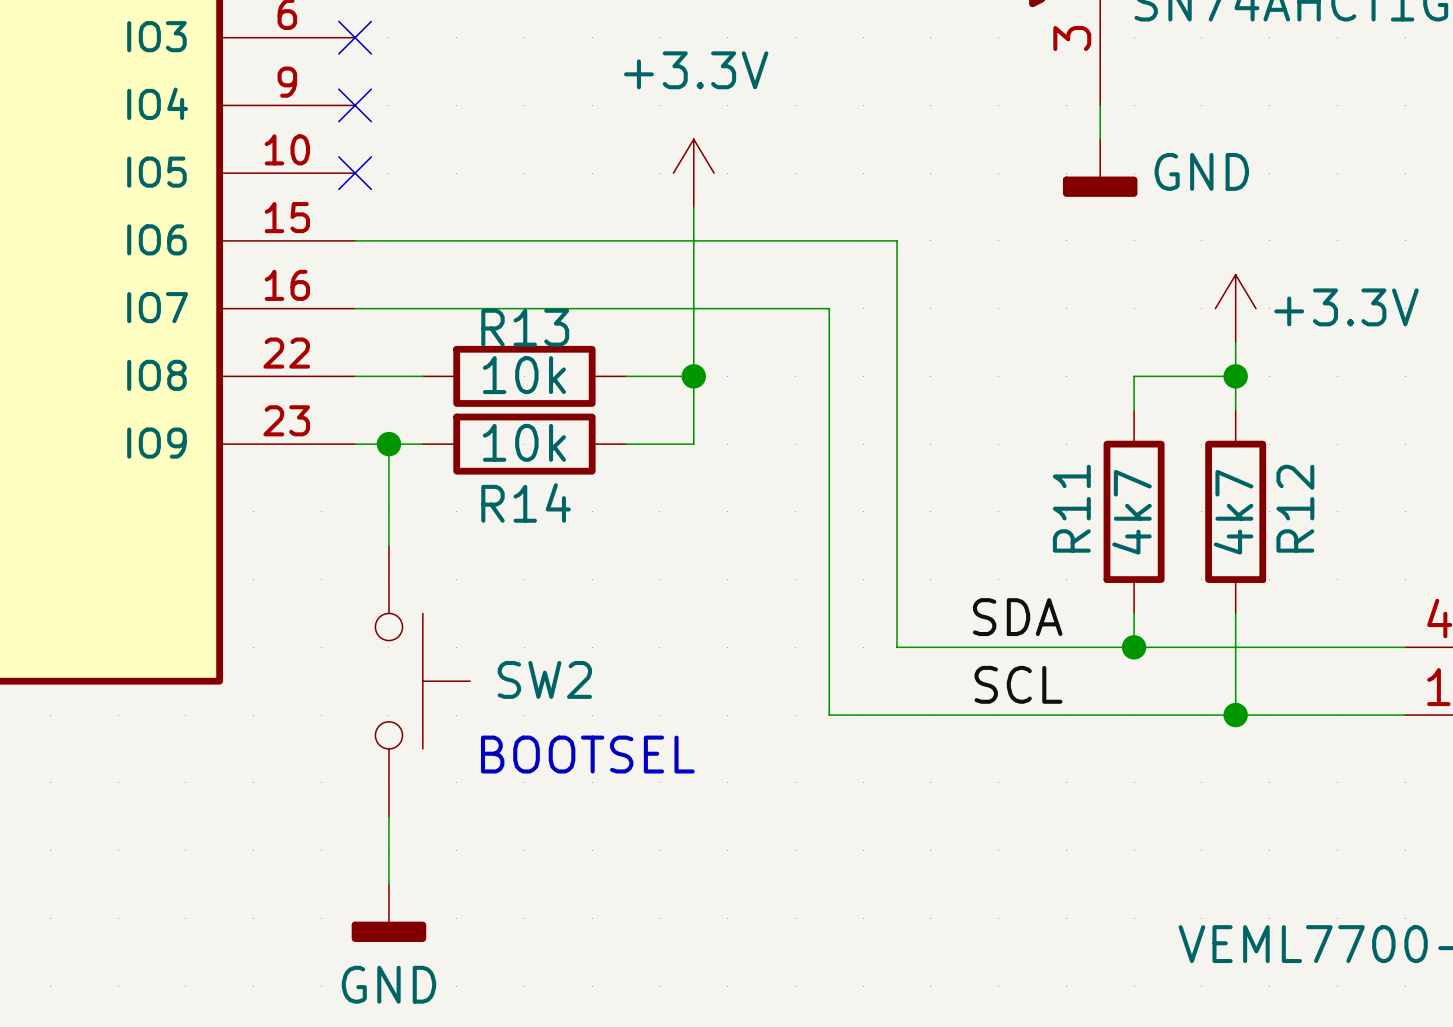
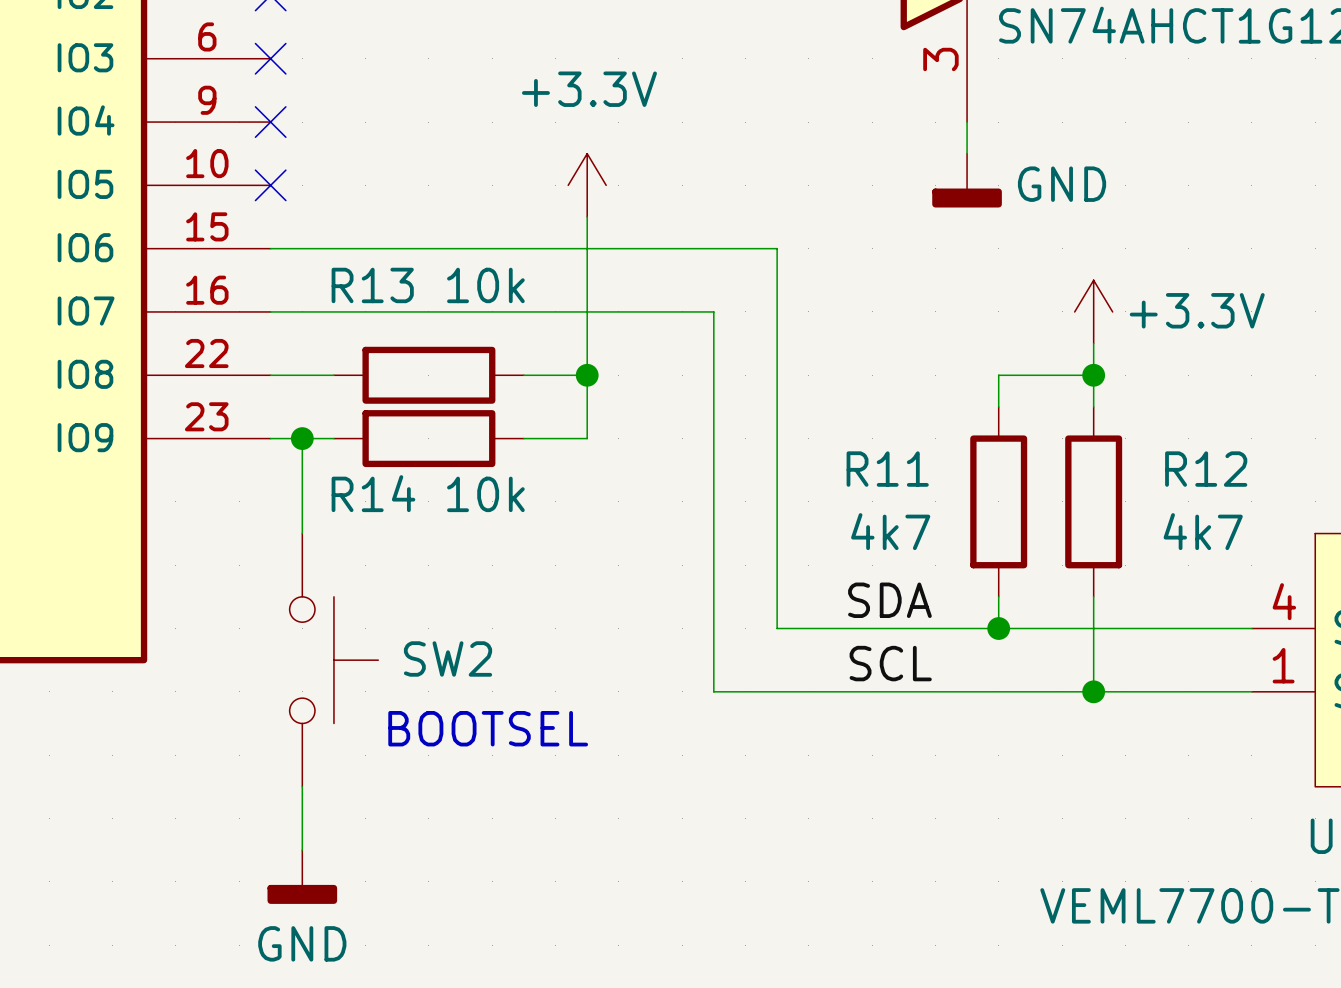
R13 name position: R13 (525, 327) -> R13 (372, 285)
R13 value position: 10k (524, 375) -> 10k (485, 285)
R14 value position: 10k (524, 442) -> 10k (485, 494)
R14 name position: R14 (526, 503) -> R14 (373, 493)
R11 name rotation: 0° (1071, 508) -> 90° clockwise (887, 469)
R12 name rotation: 0° (1295, 508) -> 90° clockwise (1206, 469)
R11 value rotation: 0° (1131, 512) -> 90° clockwise (890, 531)
R11 value position: 4k7 (1131, 512) -> 4k7 (890, 531)
R12 value rotation: 0° (1233, 512) -> 90° clockwise (1203, 531)
R12 value position: 4k7 (1233, 512) -> 4k7 (1203, 531)

